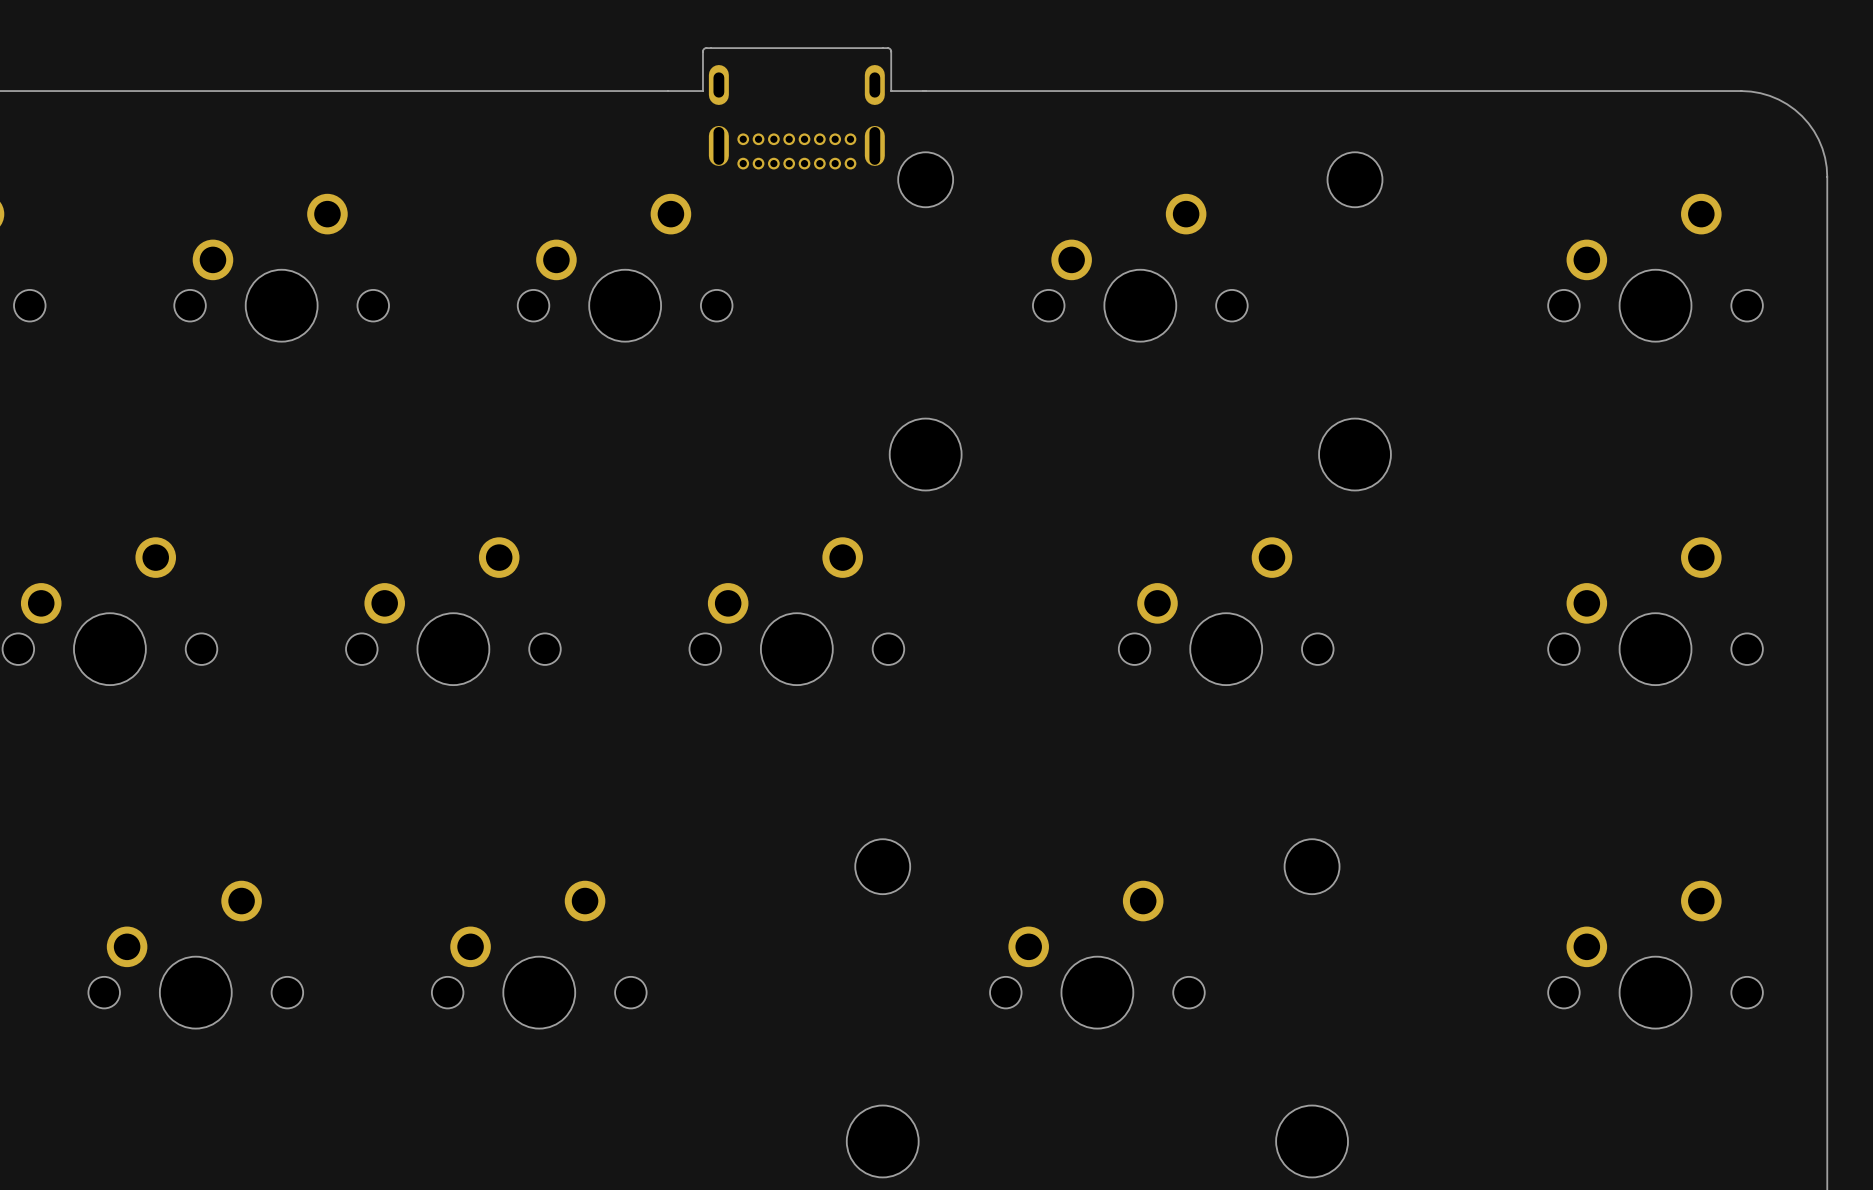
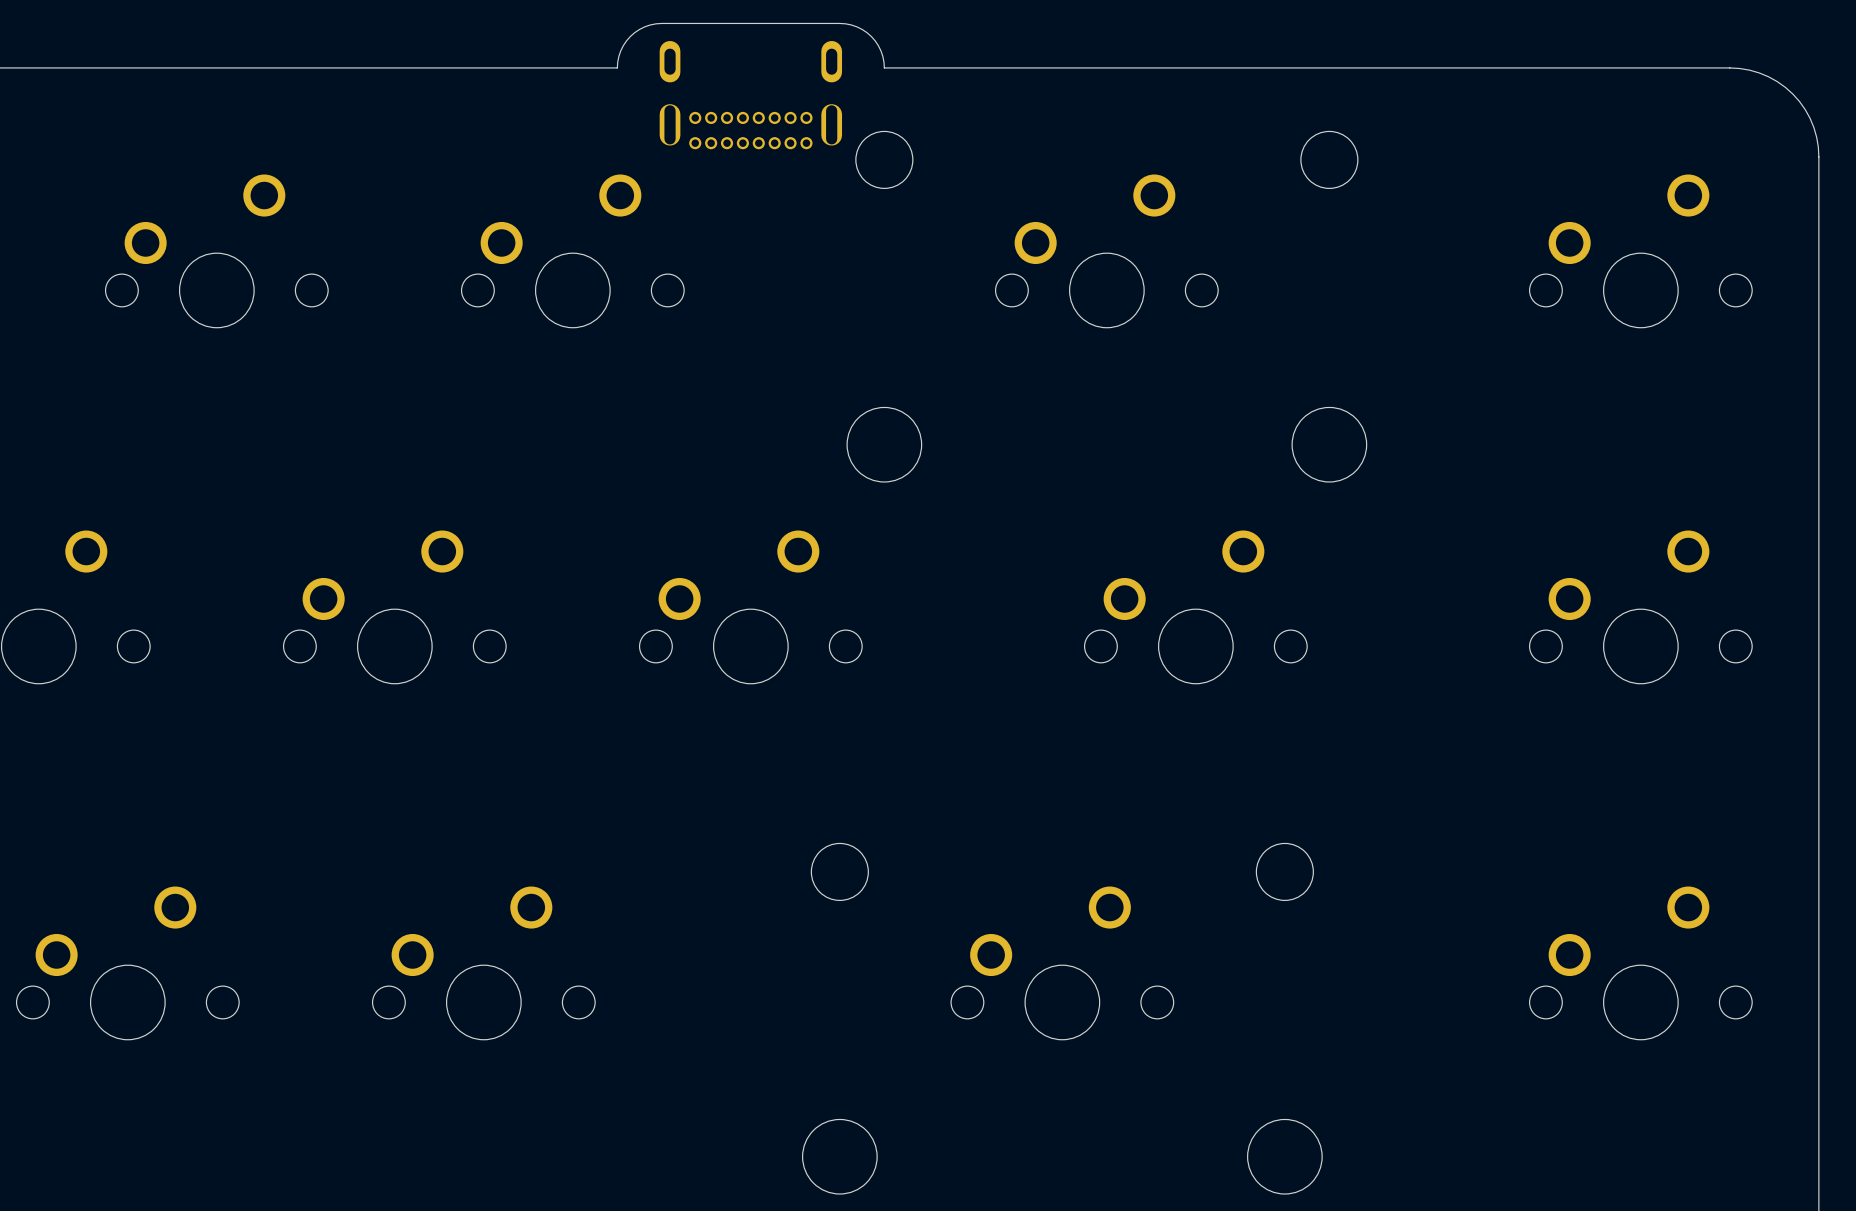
board edge: (710, 48) (705, 48) (703, 51) (702, 91) (668, 91) -> (661, 23) (644, 26) (630, 36) (620, 50) (617, 67)
board edge: (882, 48) (889, 48) (891, 51) (891, 91) (925, 91) -> (839, 23) (856, 26) (871, 36) (880, 50) (884, 67)

